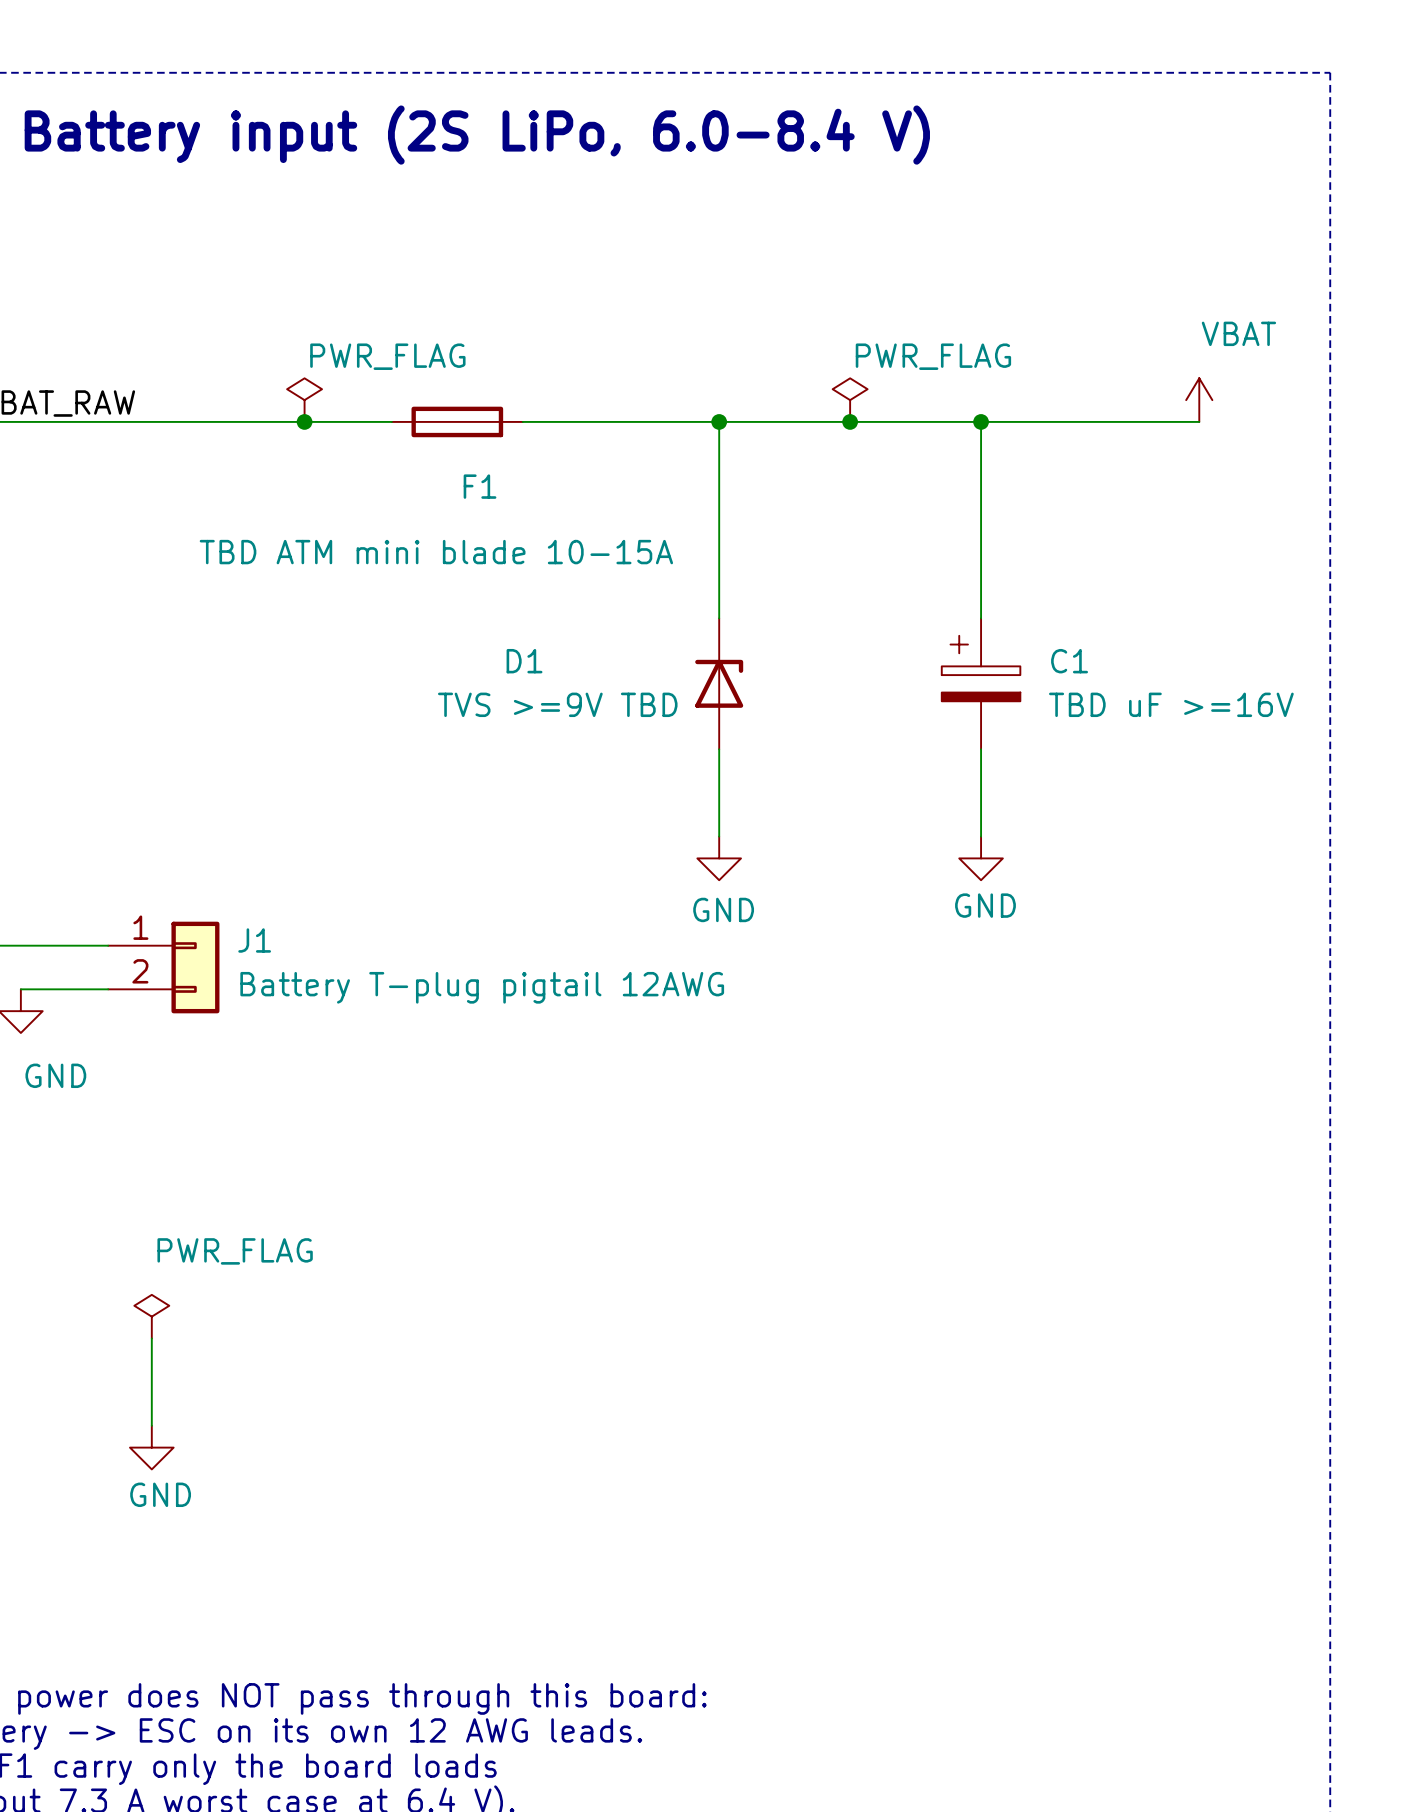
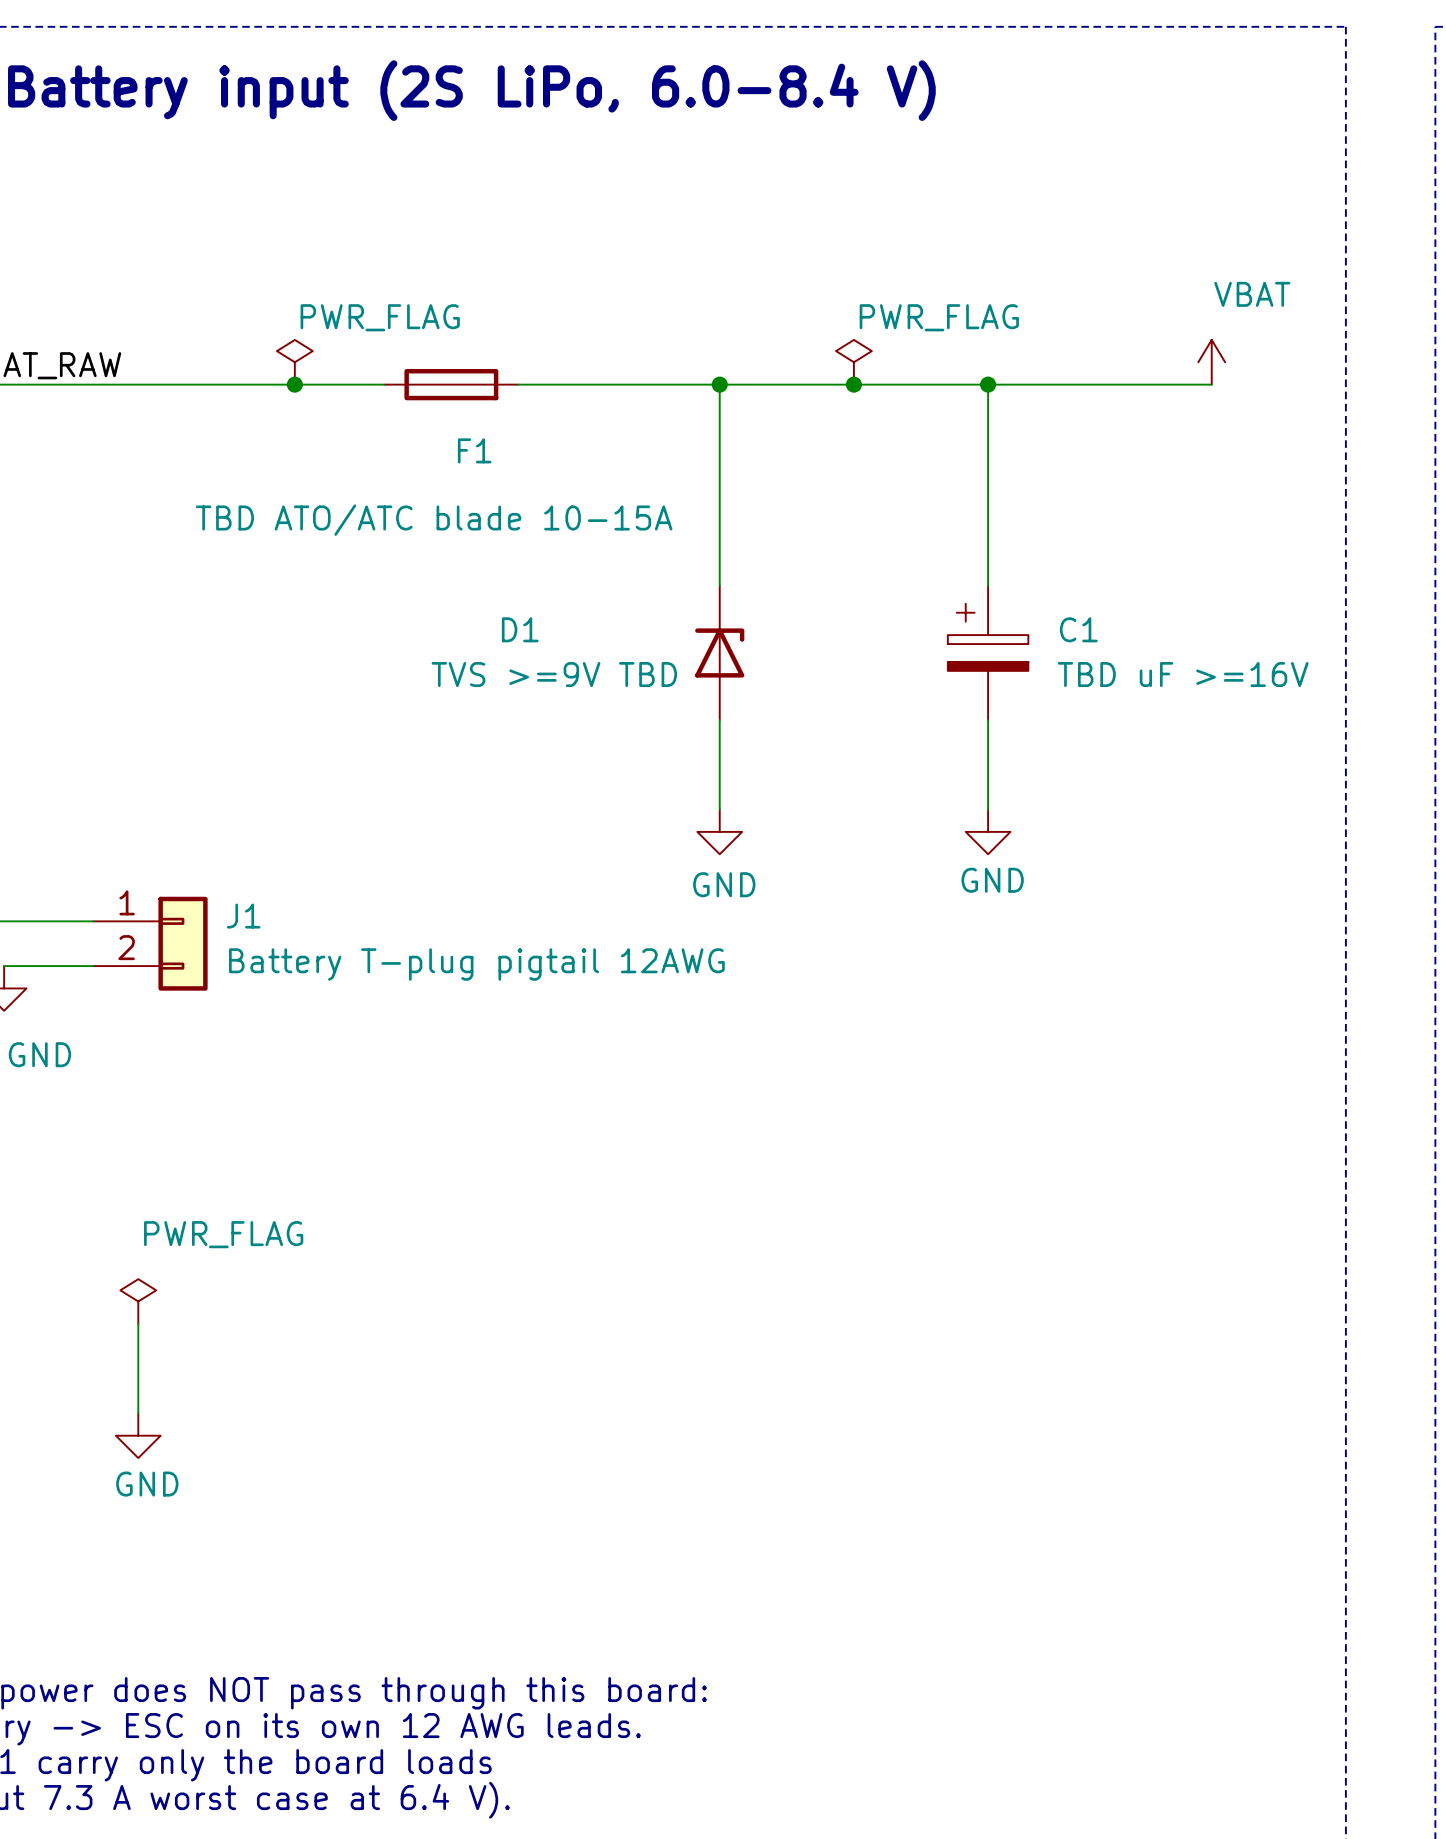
F1 value: TBD ATM mini blade 10-15A (436, 552) -> TBD ATO/ATC blade 10-15A (434, 520)

